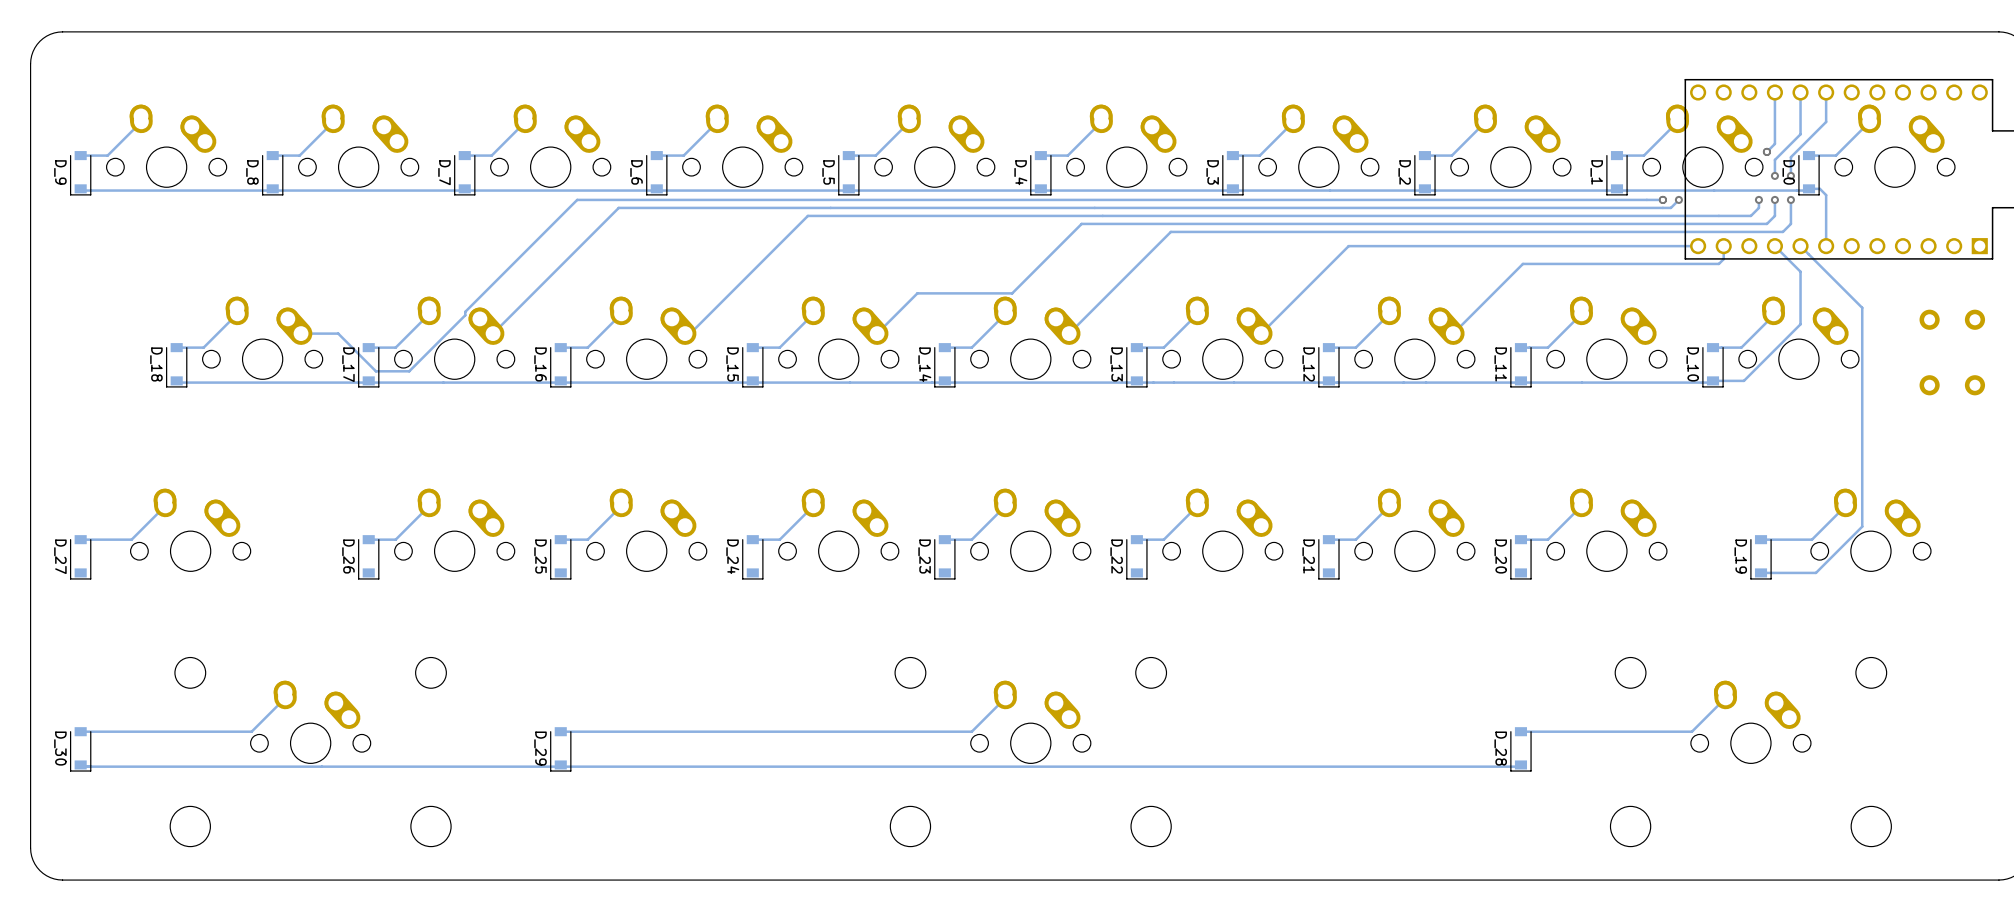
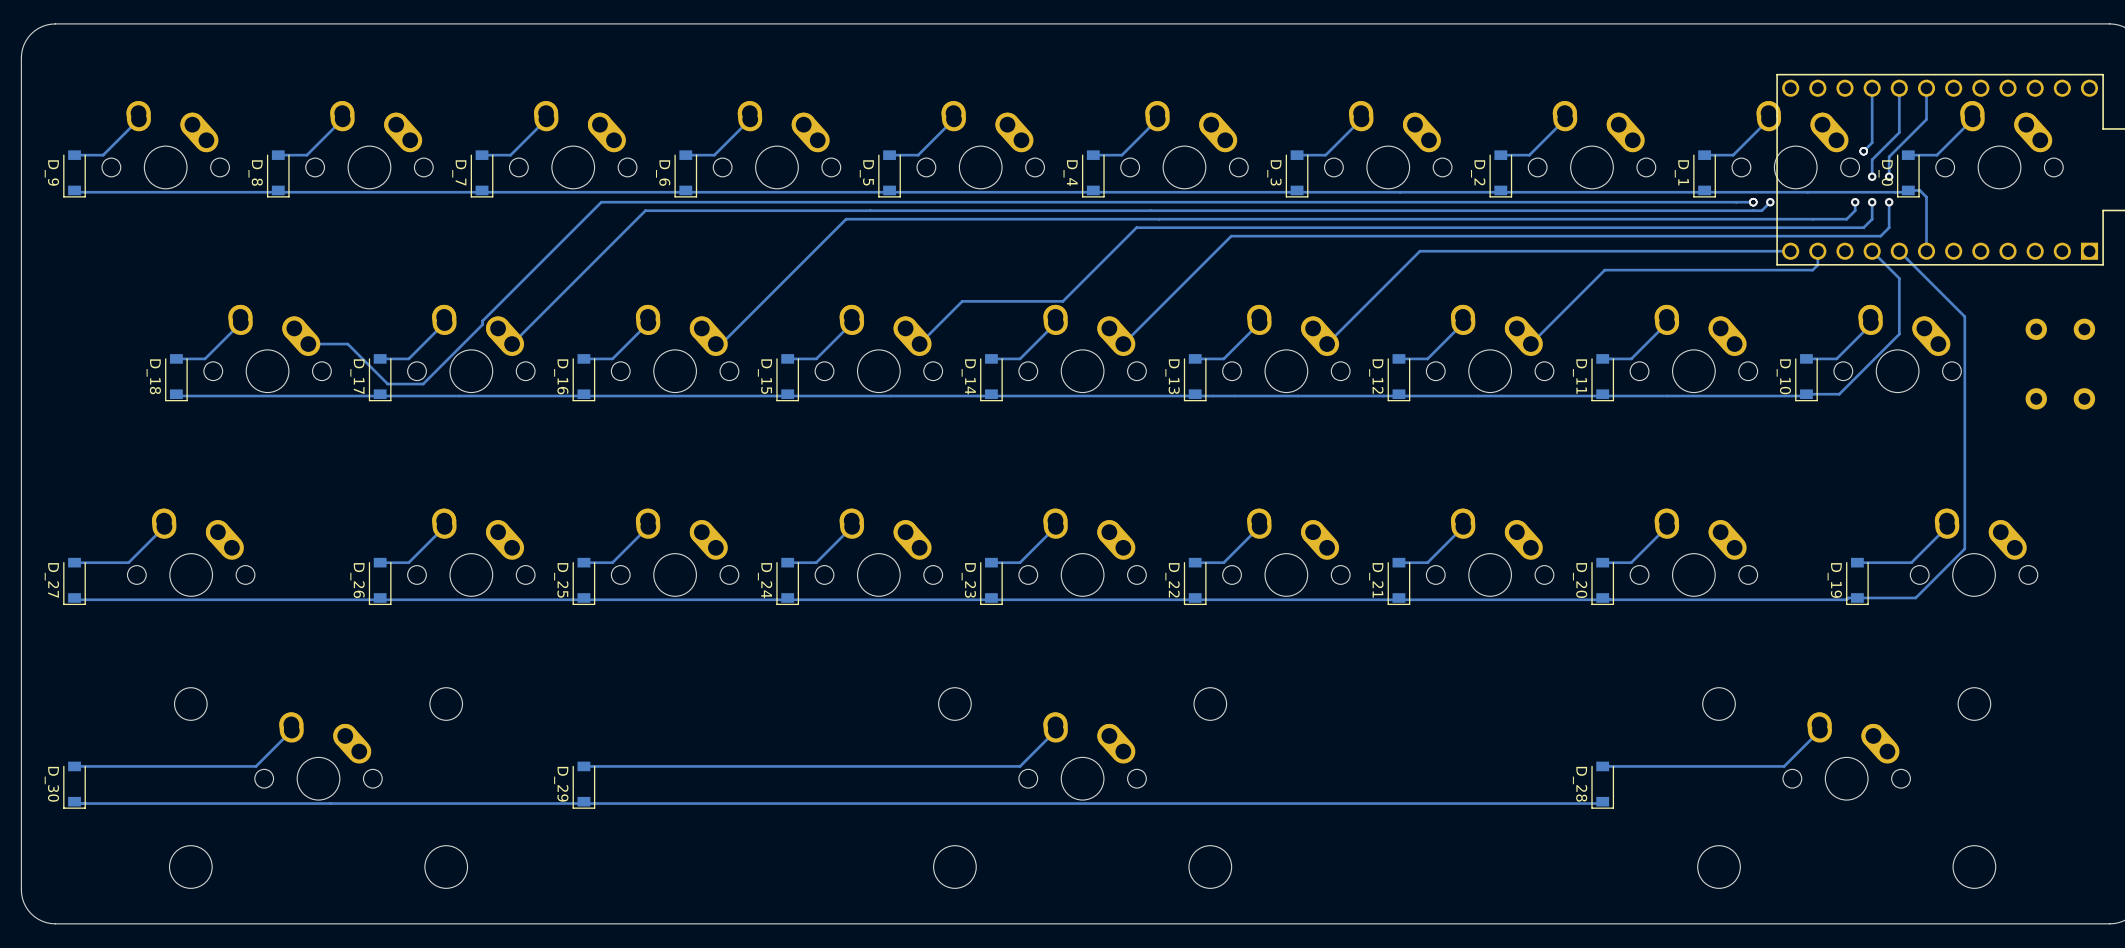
track: none -> (1857, 597) (1846, 599) (1400, 599) (1398, 597)
track: none -> (376, 599) (79, 599)
track: none -> (1191, 599) (384, 599)
track: none -> (1395, 599) (1194, 599)

